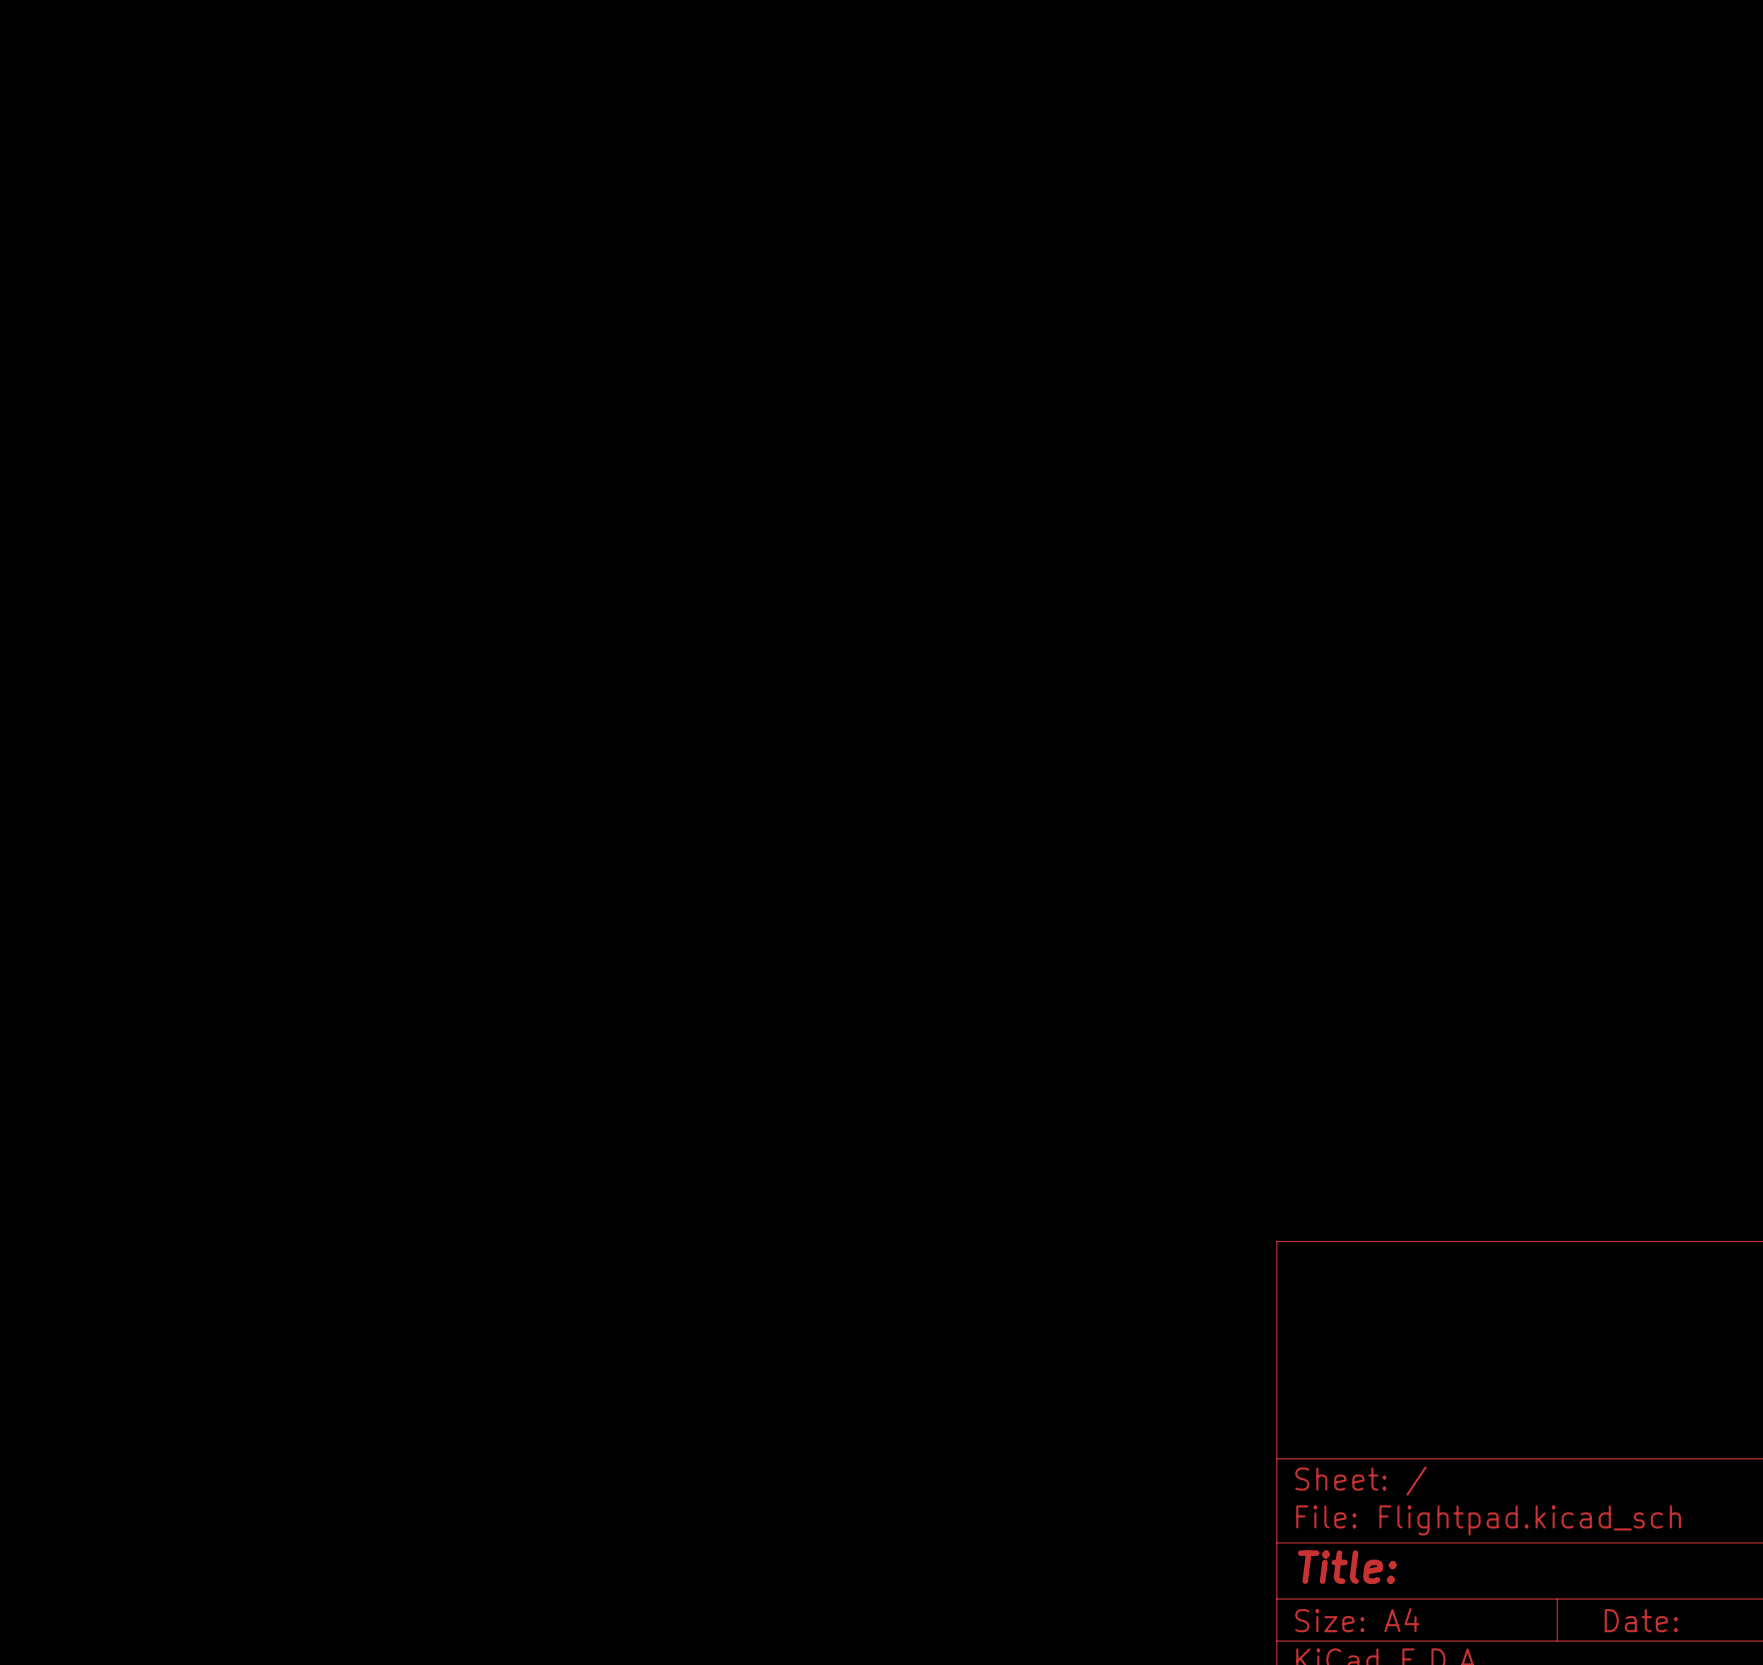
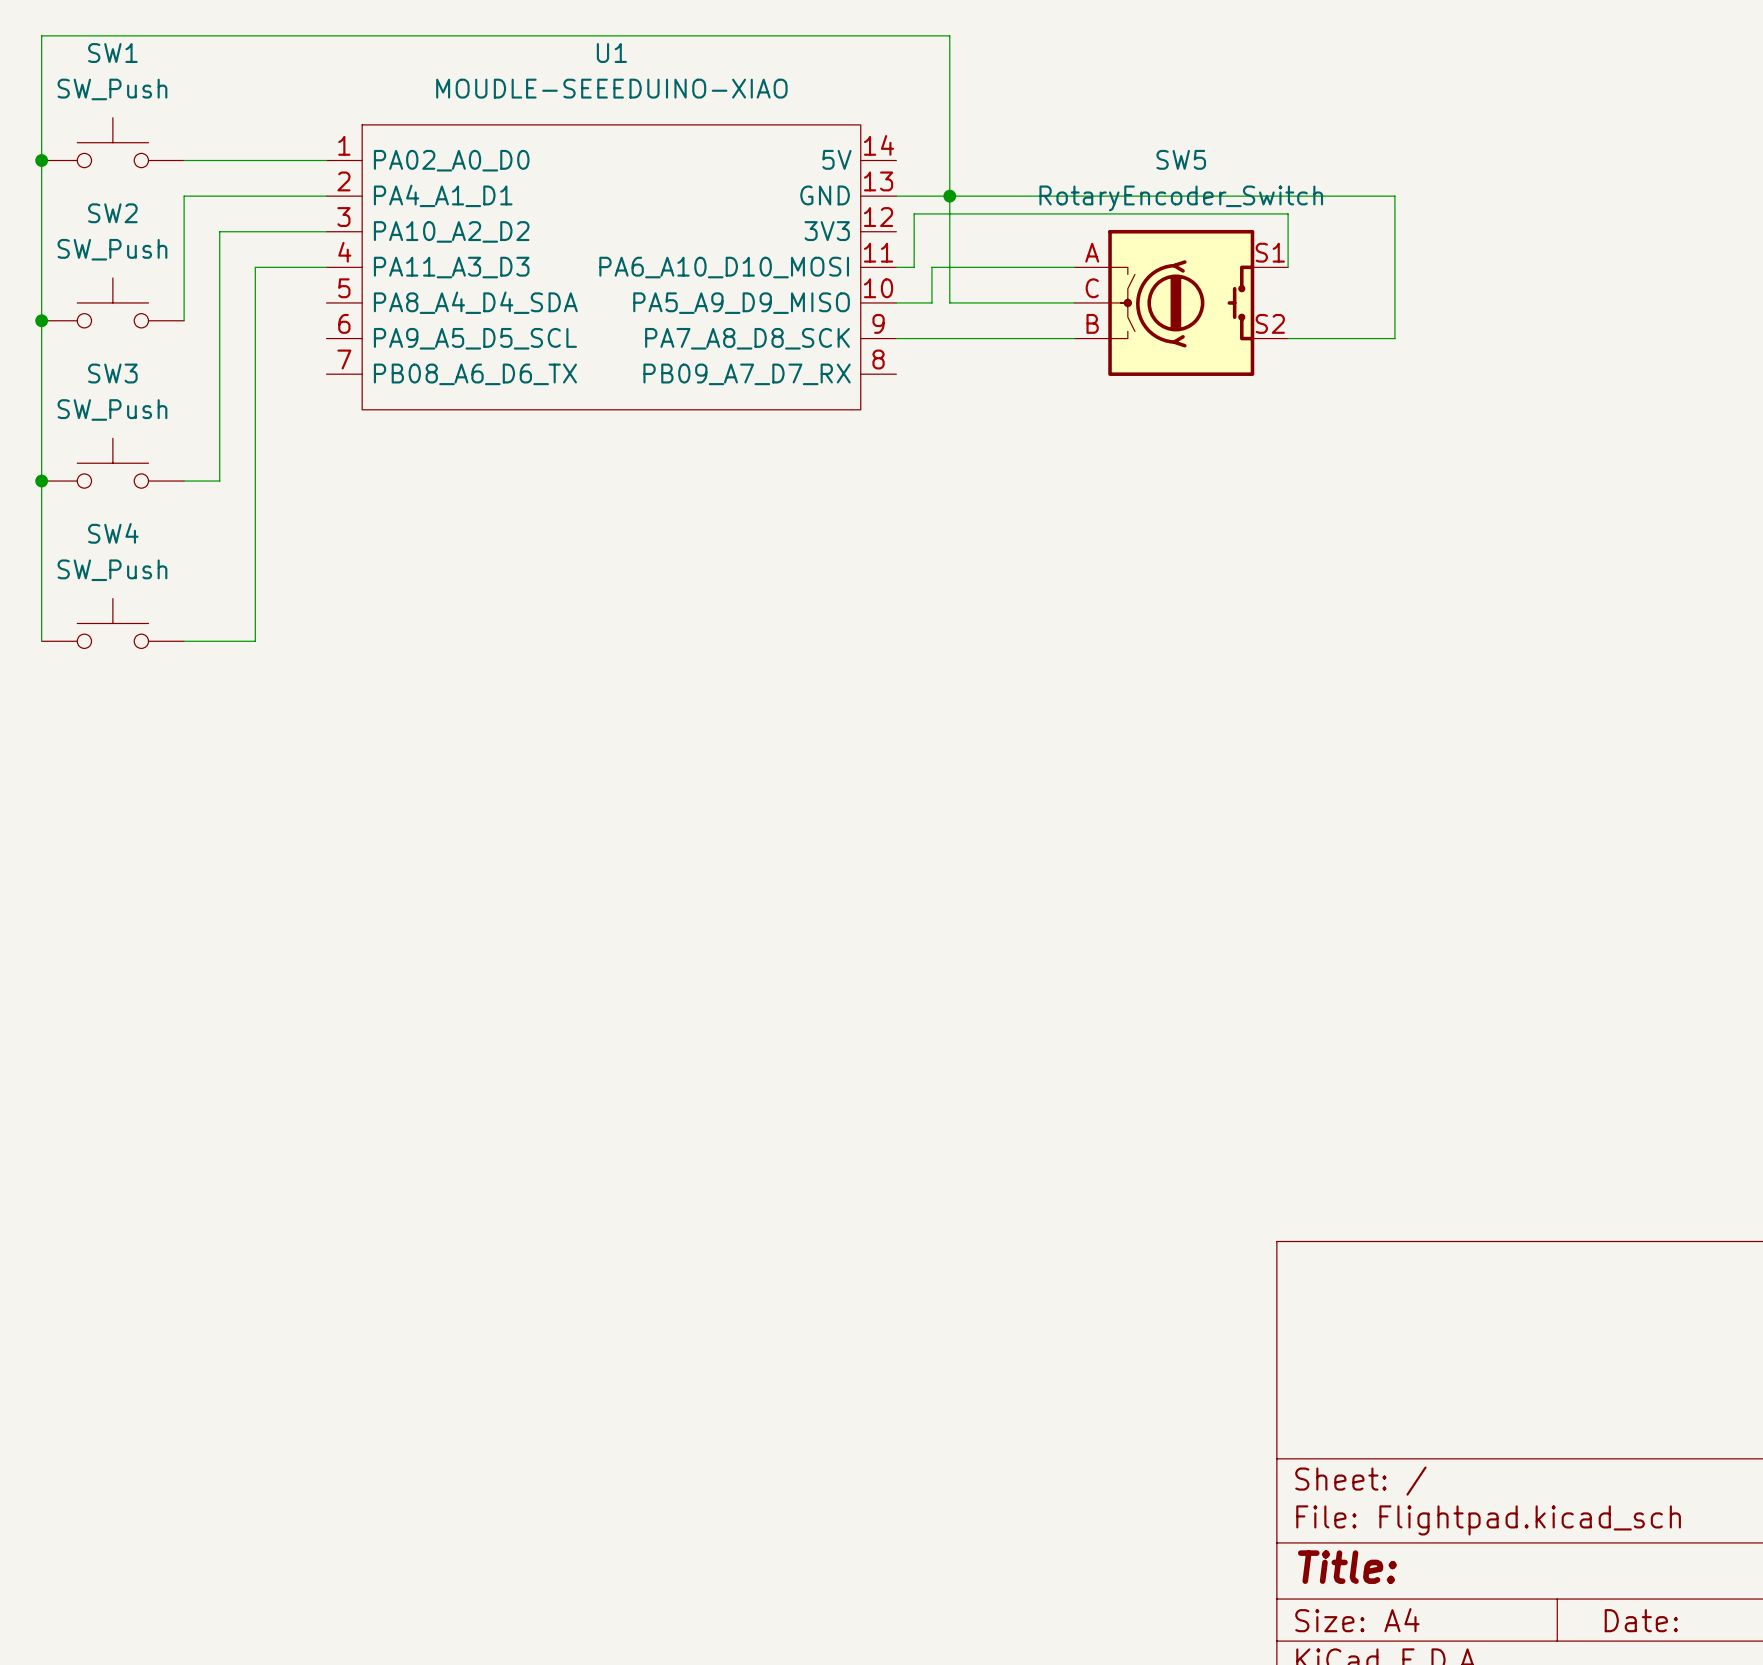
SW1: none -> SW_Push (112, 142)
junction: none -> (41, 160)
wire: none -> (184, 160) (326, 160)
wire: none -> (326, 196) (184, 196) (184, 320)
wire: none -> (896, 196) (1394, 196) (1394, 338) (1288, 338)
junction: none -> (949, 196)
wire: none -> (326, 231) (219, 231) (219, 481) (184, 481)
wire: none -> (326, 267) (255, 267) (255, 641) (184, 641)
U1: none -> MOUDLE-SEEEDUINO-XIAO (611, 267)
wire: none -> (896, 267) (914, 267) (914, 213) (1288, 213) (1288, 267)
wire: none -> (1074, 267) (931, 267) (931, 302) (896, 302)
SW2: none -> SW_Push (112, 302)
wire: none -> (1074, 302) (949, 302) (949, 35) (41, 35) (41, 641)
SW5: none -> RotaryEncoder_Switch (1181, 302)
junction: none -> (41, 320)
wire: none -> (896, 338) (1074, 338)
SW3: none -> SW_Push (112, 463)
junction: none -> (41, 481)
SW4: none -> SW_Push (112, 623)

